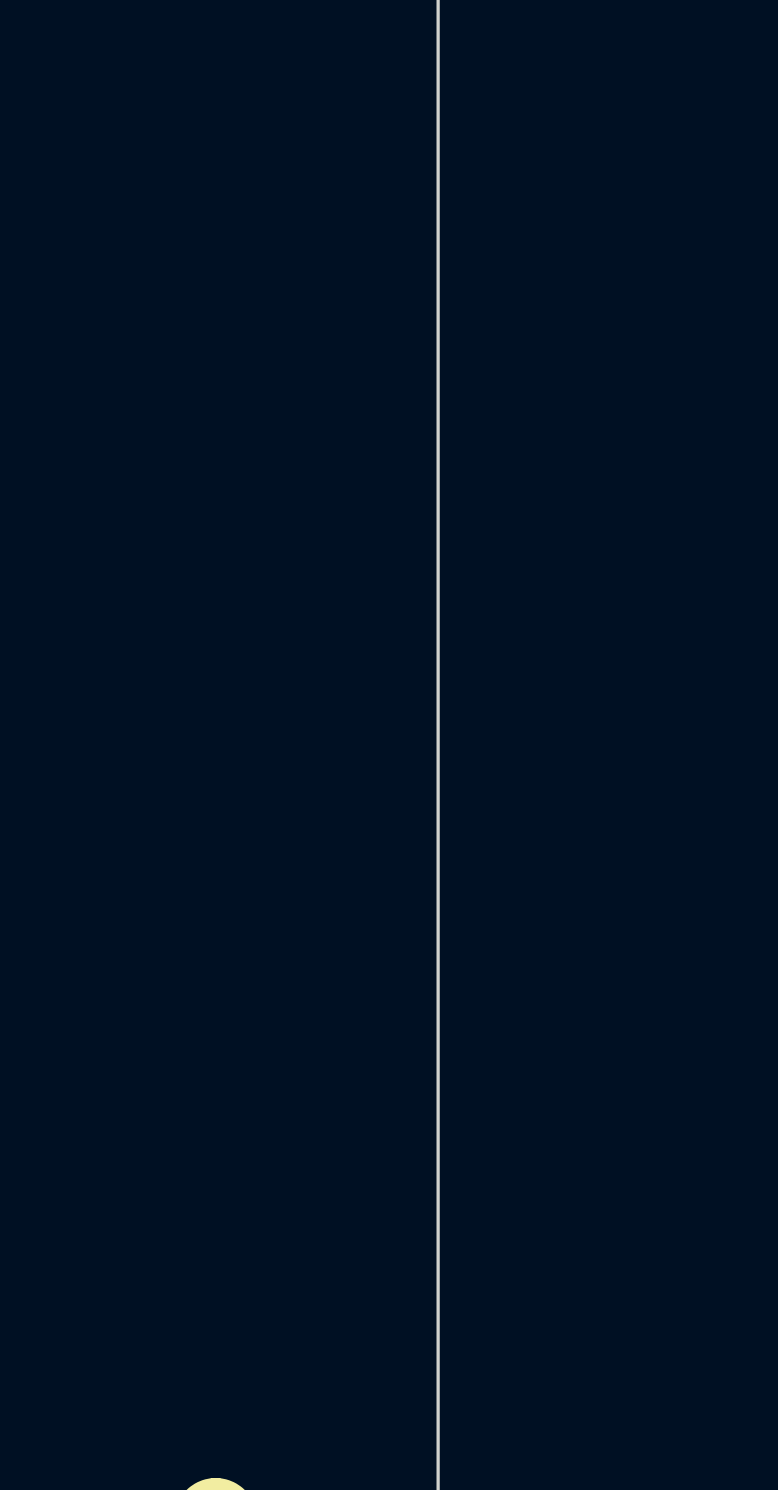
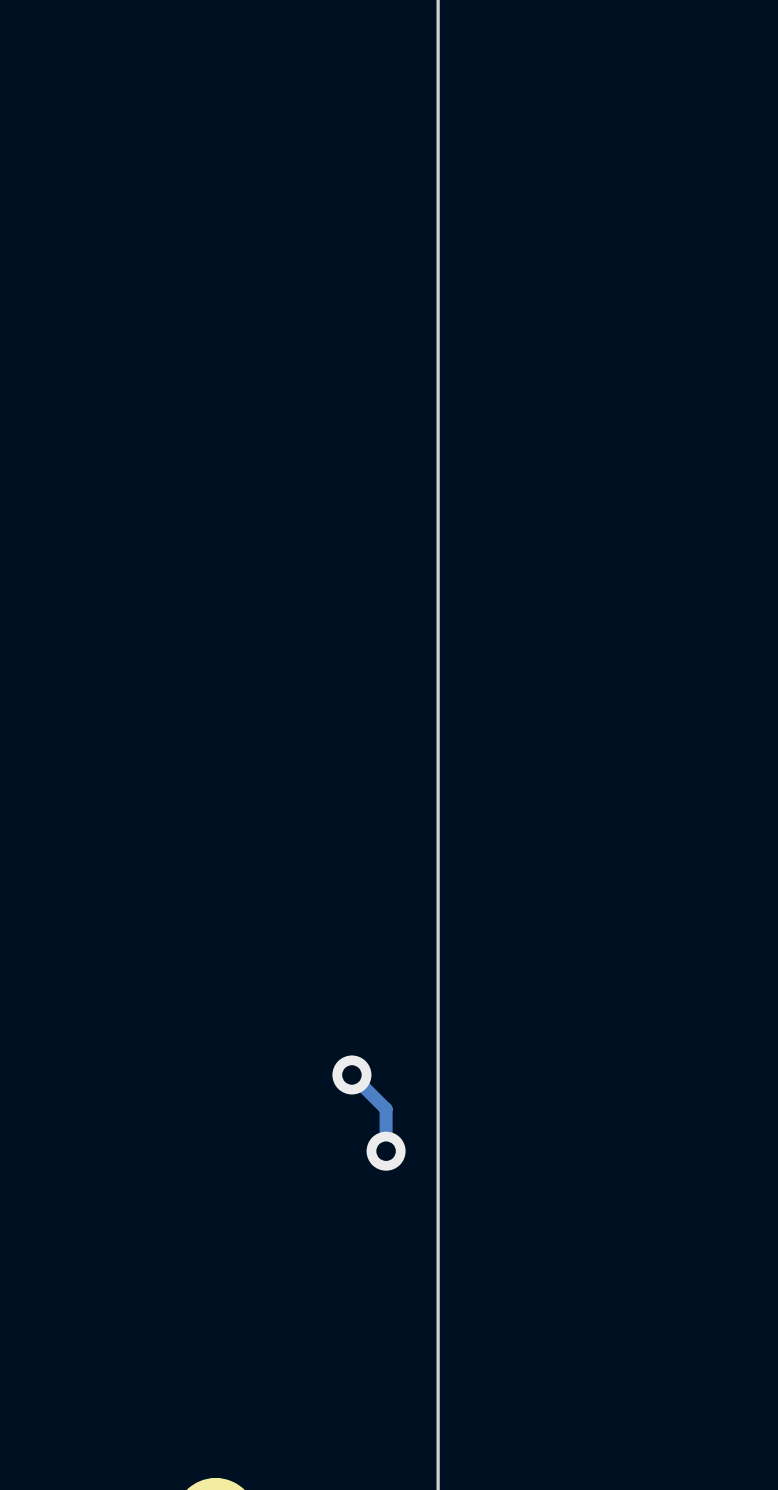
track: none -> (351, 1074) (386, 1109) (386, 1151)
via: none -> (351, 1074)
via: none -> (386, 1151)

